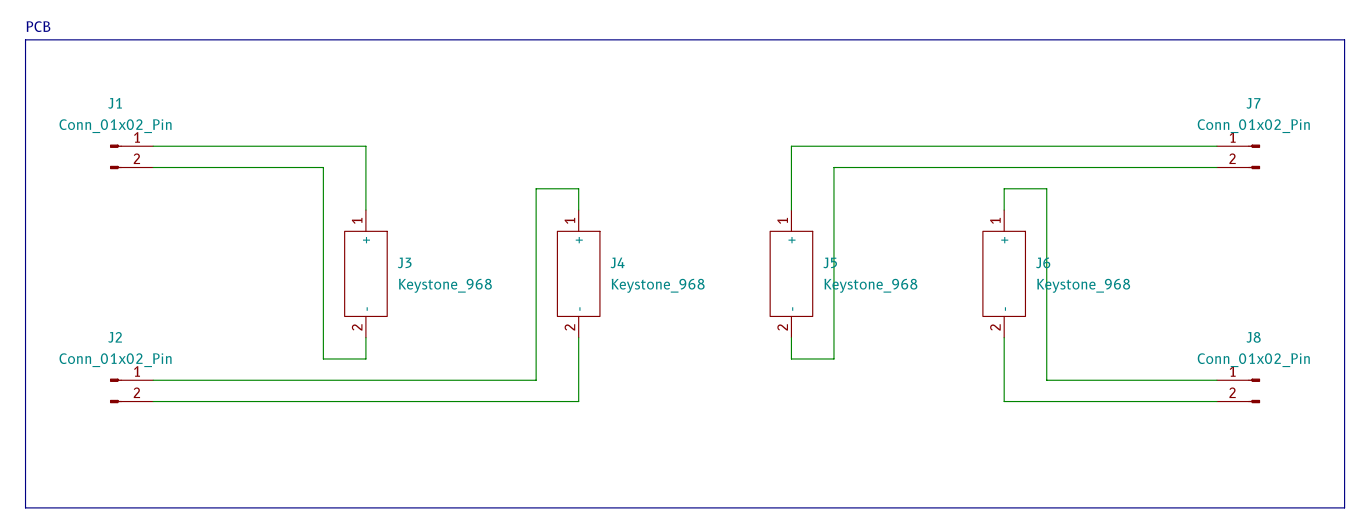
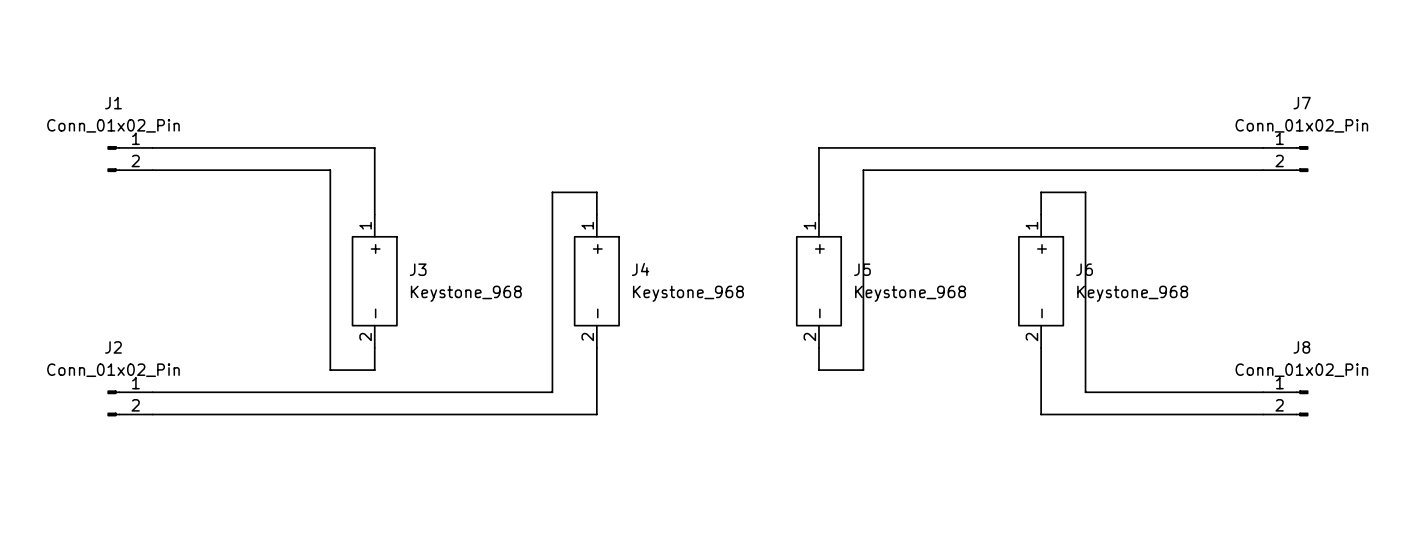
text: PCB (38, 26) -> none
line: (25, 39) (1344, 39) (1344, 507) (25, 507) (25, 39) -> none

